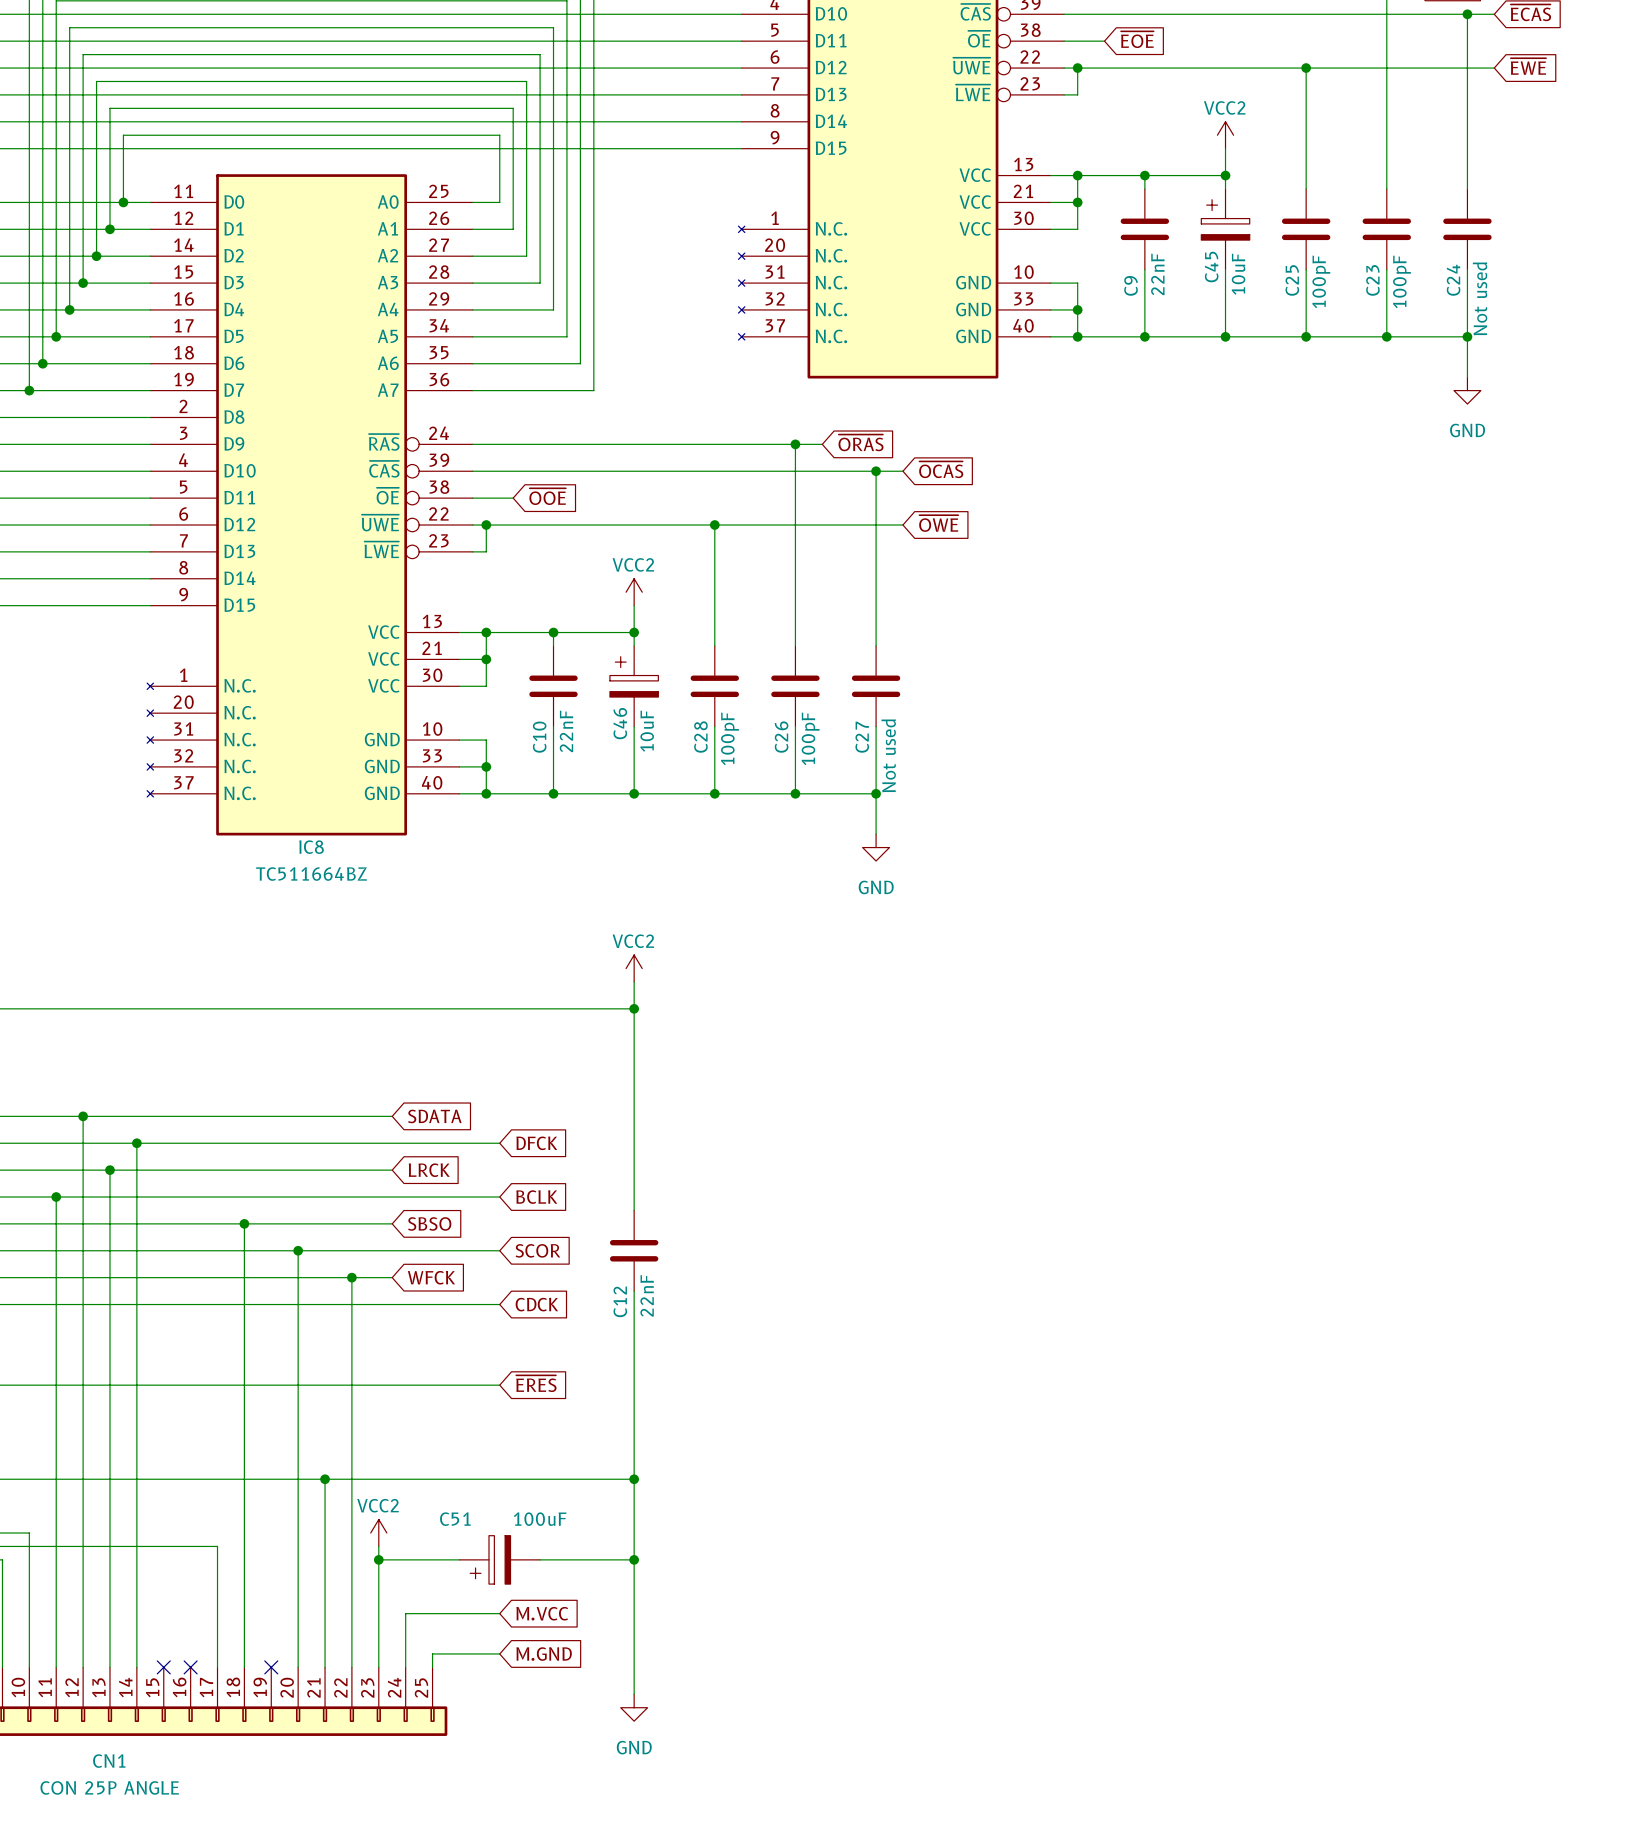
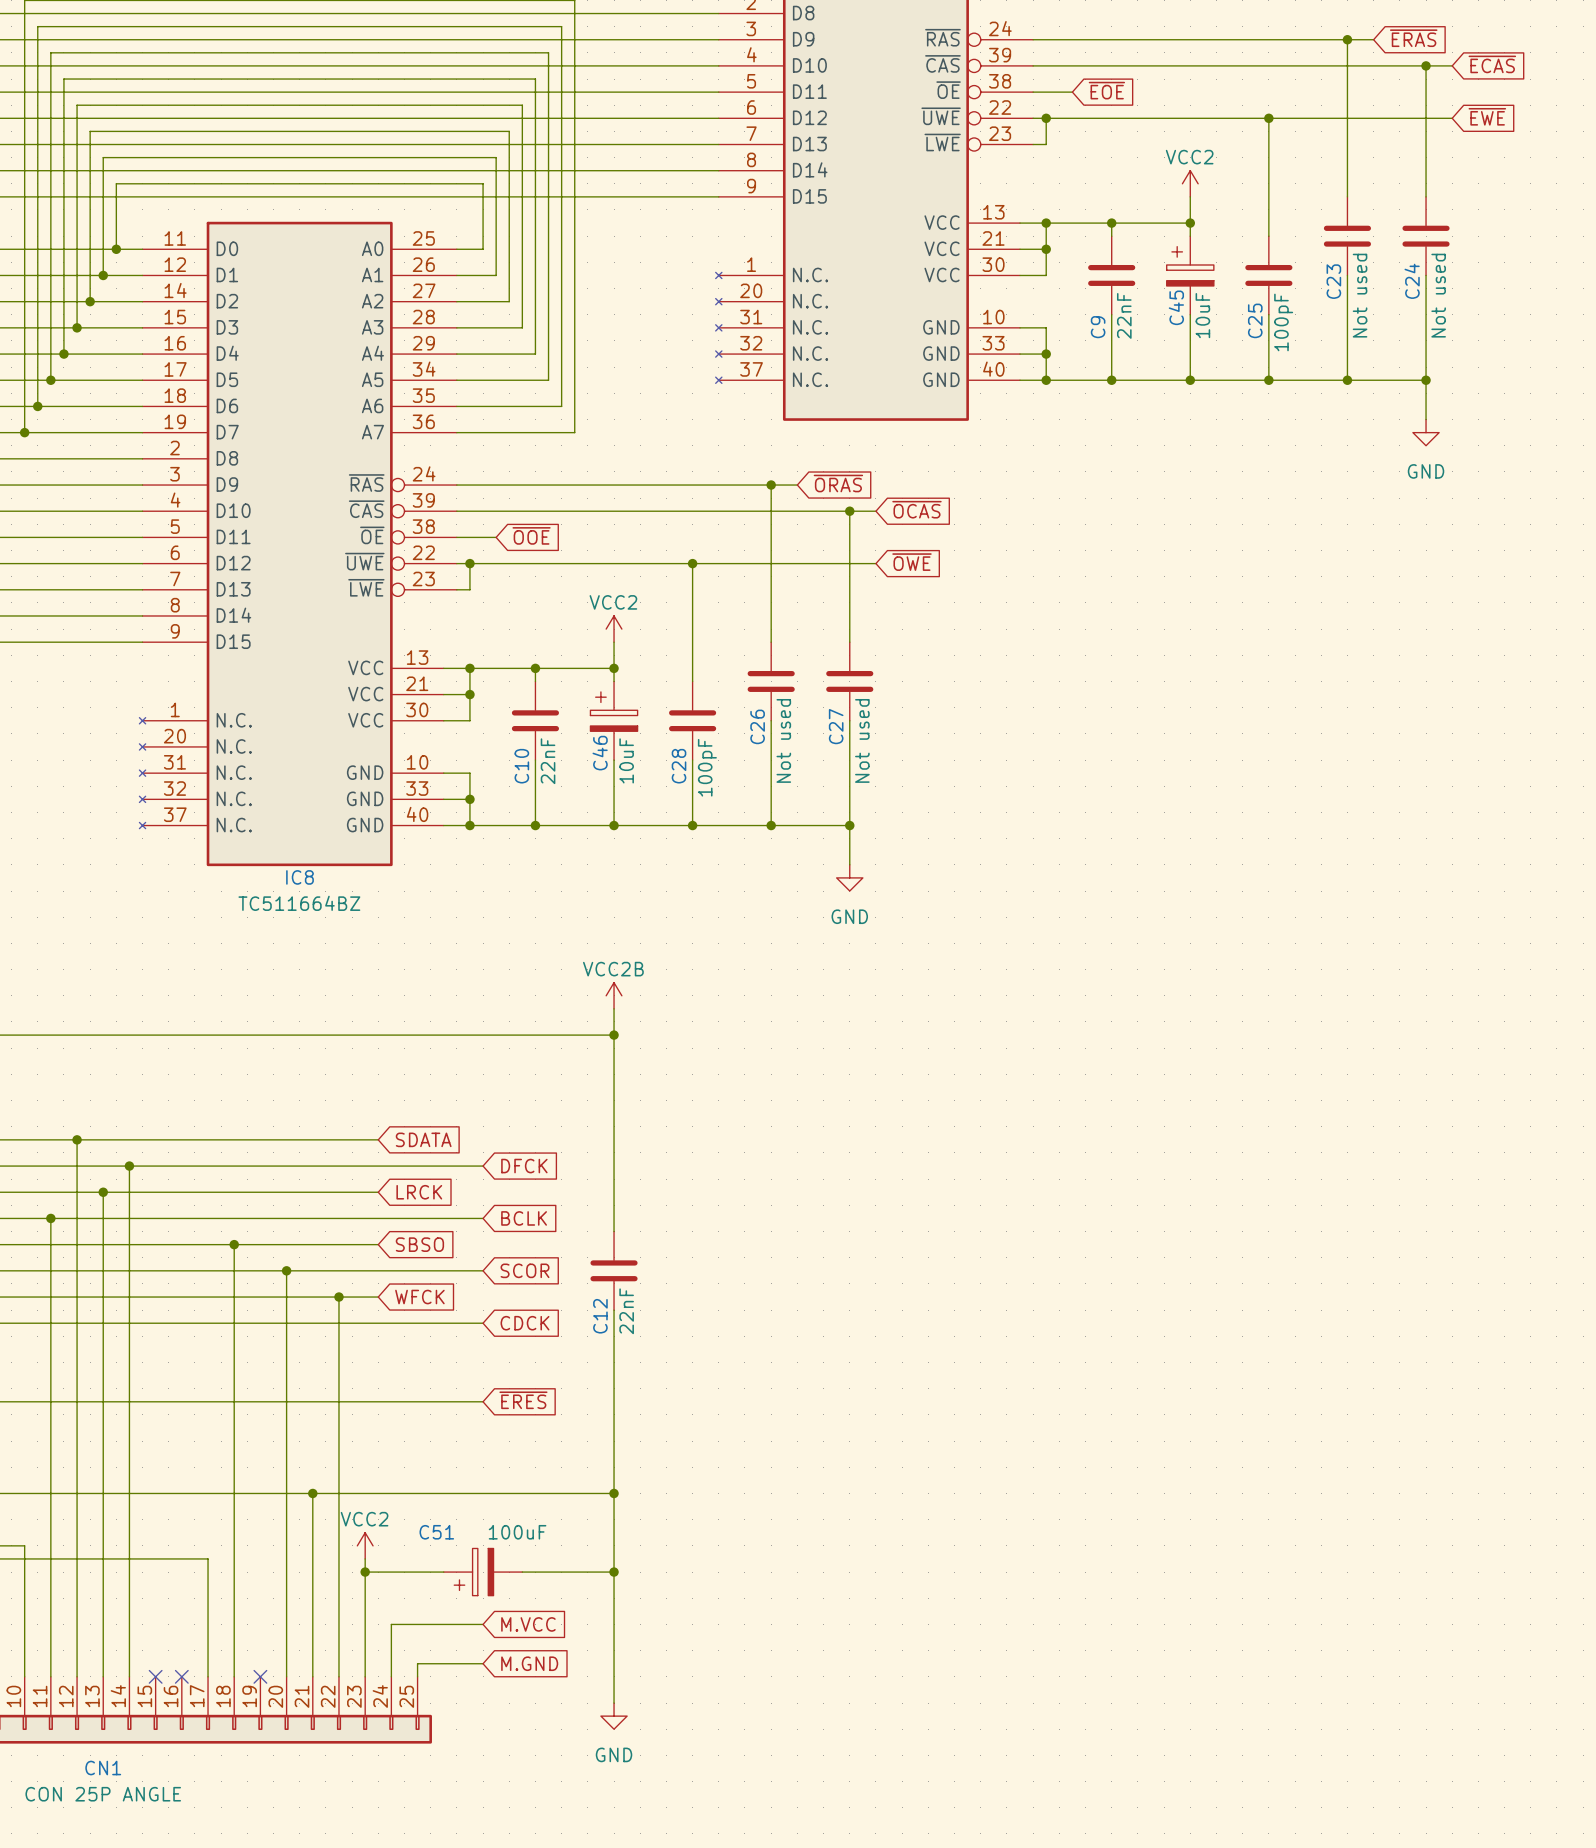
C23 position: (1386, 229) -> (1347, 236)
C24 position: (1467, 229) -> (1426, 236)
C23 value: 100pF (1401, 281) -> Not used (1360, 295)
C26 position: (795, 686) -> (771, 681)
C27 position: (876, 686) -> (849, 681)
C26 value: 100pF (810, 738) -> Not used (783, 740)
power symbol: VCC2 (634, 968) -> VCC2B (614, 995)

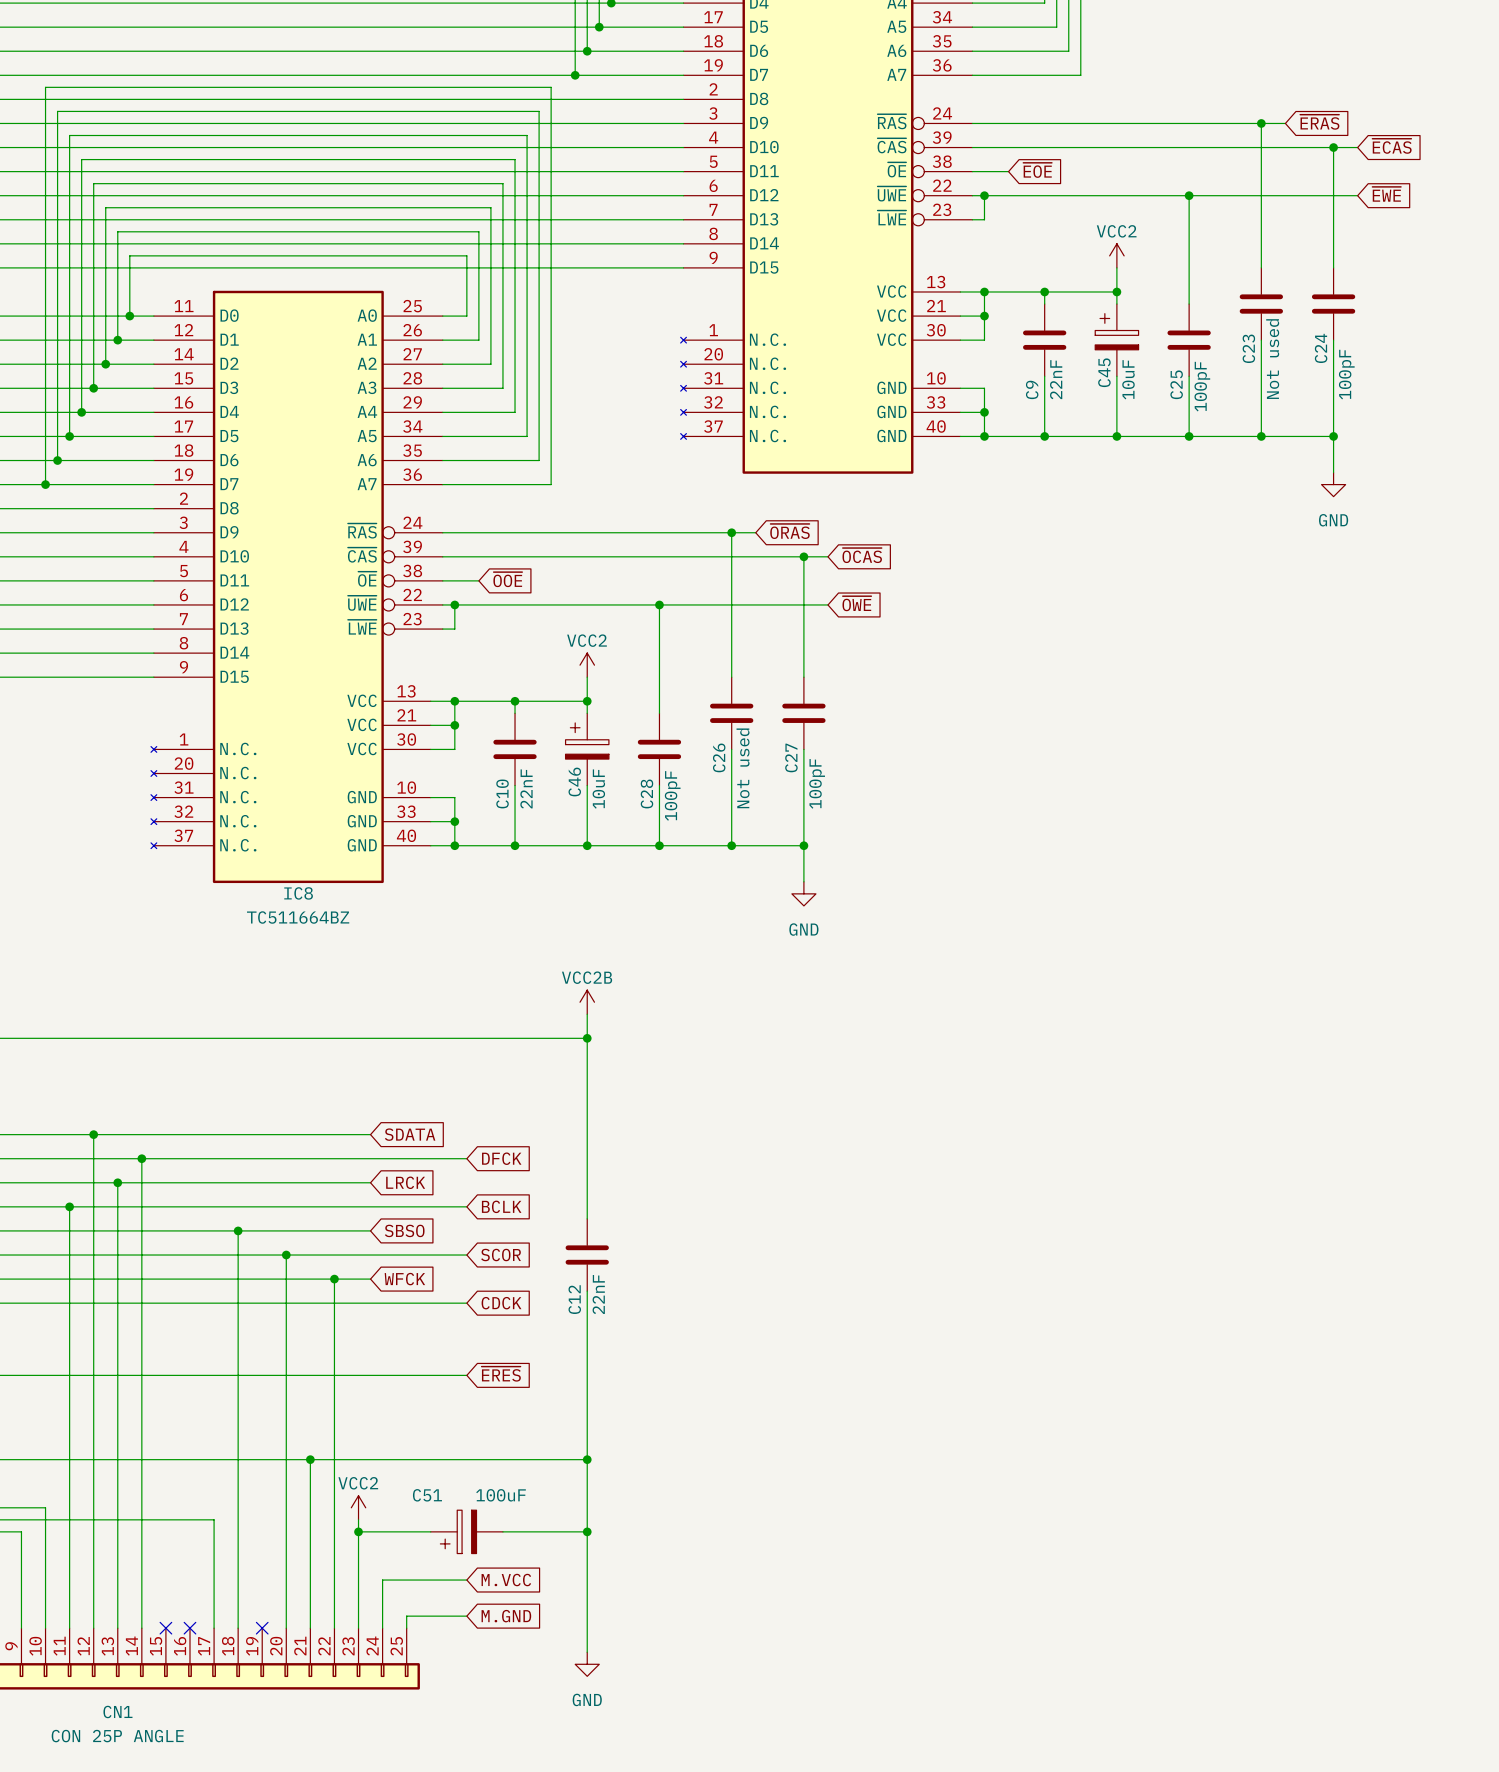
C24 value: Not used (1438, 295) -> 100pF (1346, 374)
C27 value: Not used (862, 740) -> 100pF (817, 783)

